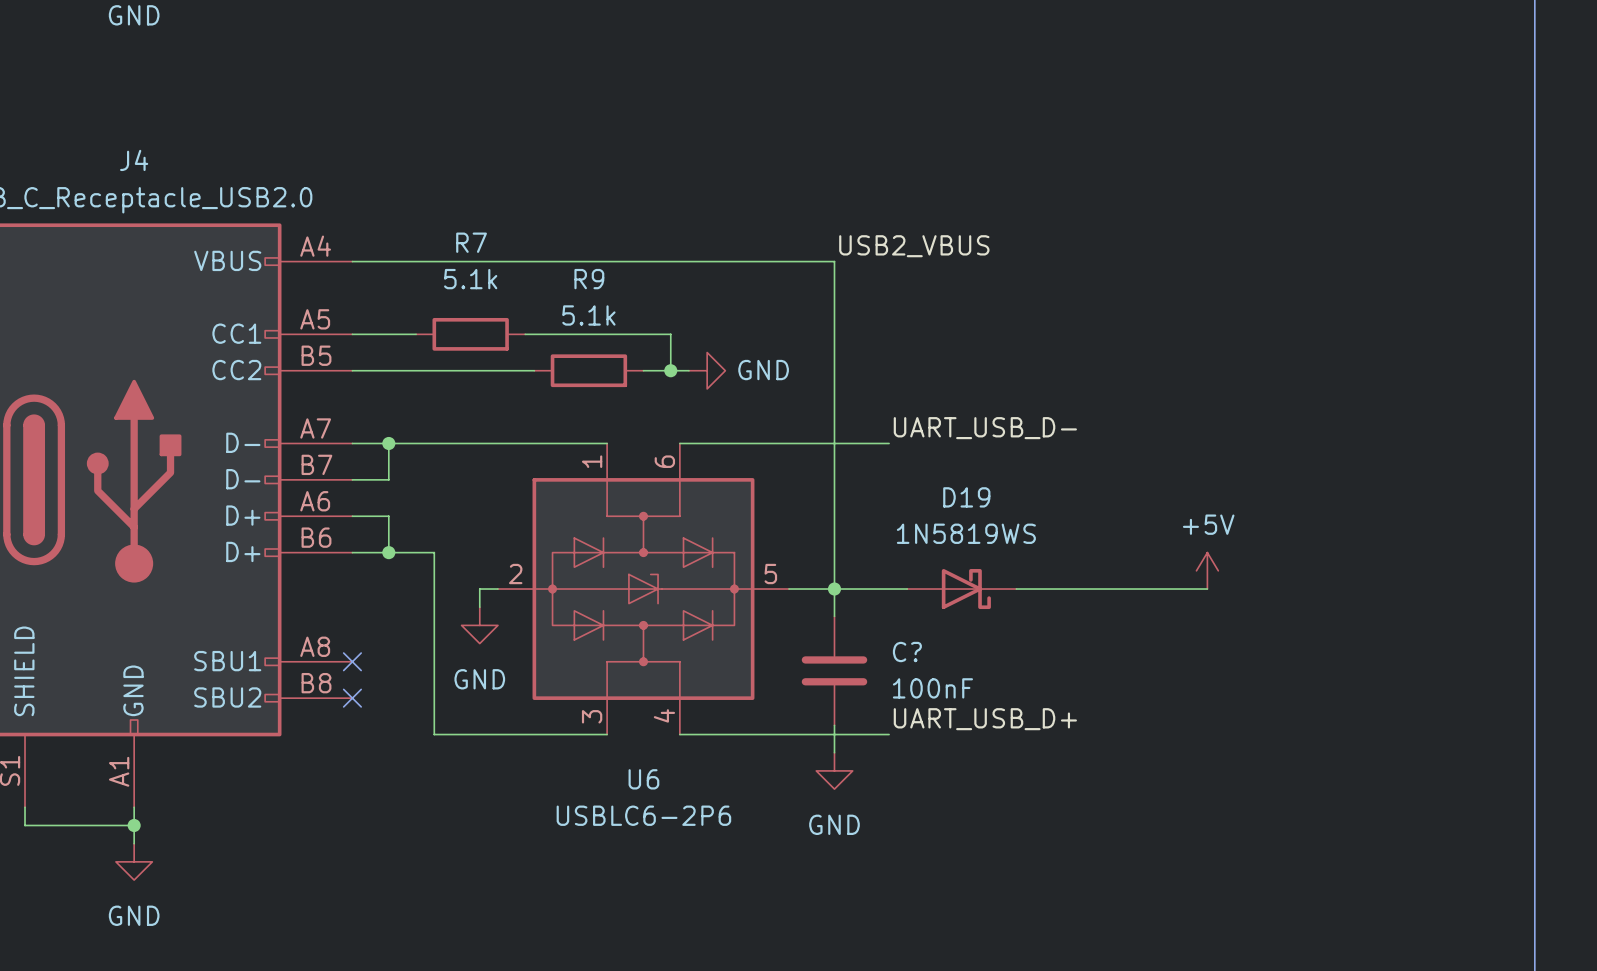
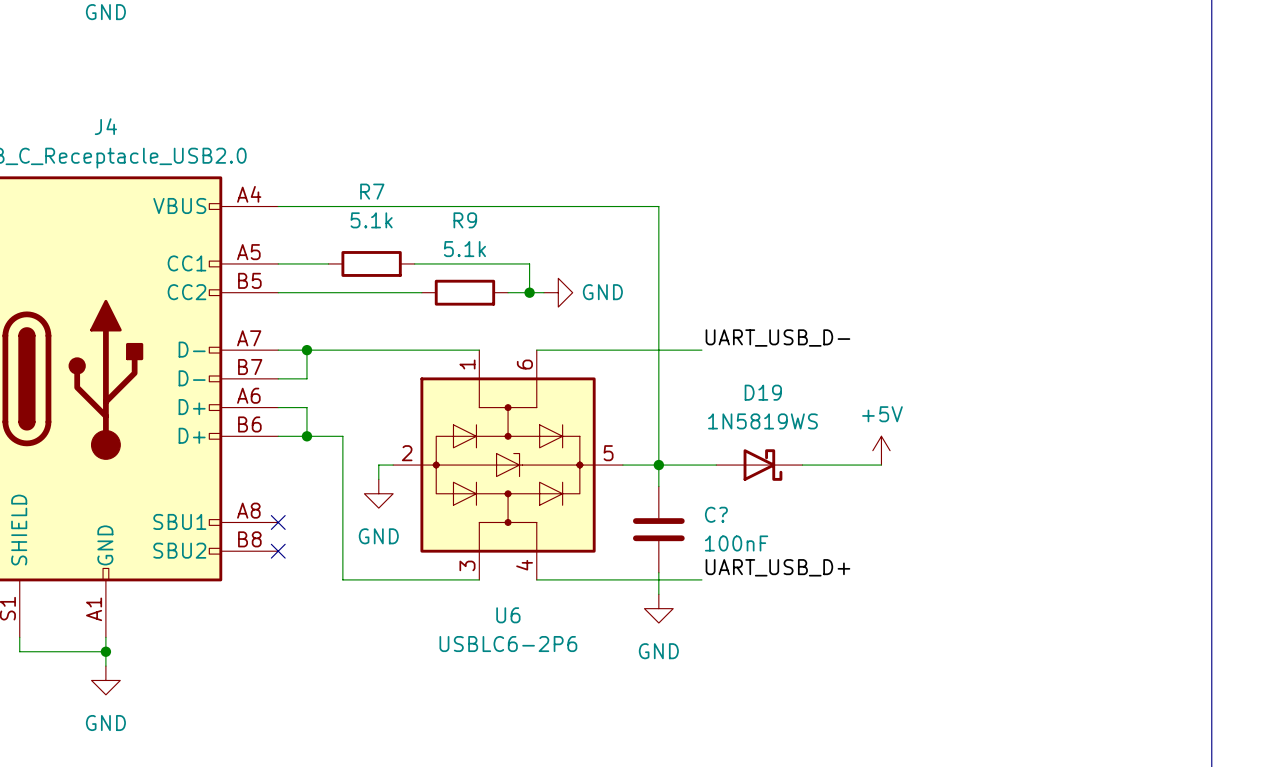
label: USB2_VBUS (914, 246) -> none
power symbol position: +5V (1207, 570) -> +5V (881, 450)
wire: (1116, 589) (1207, 589) -> none

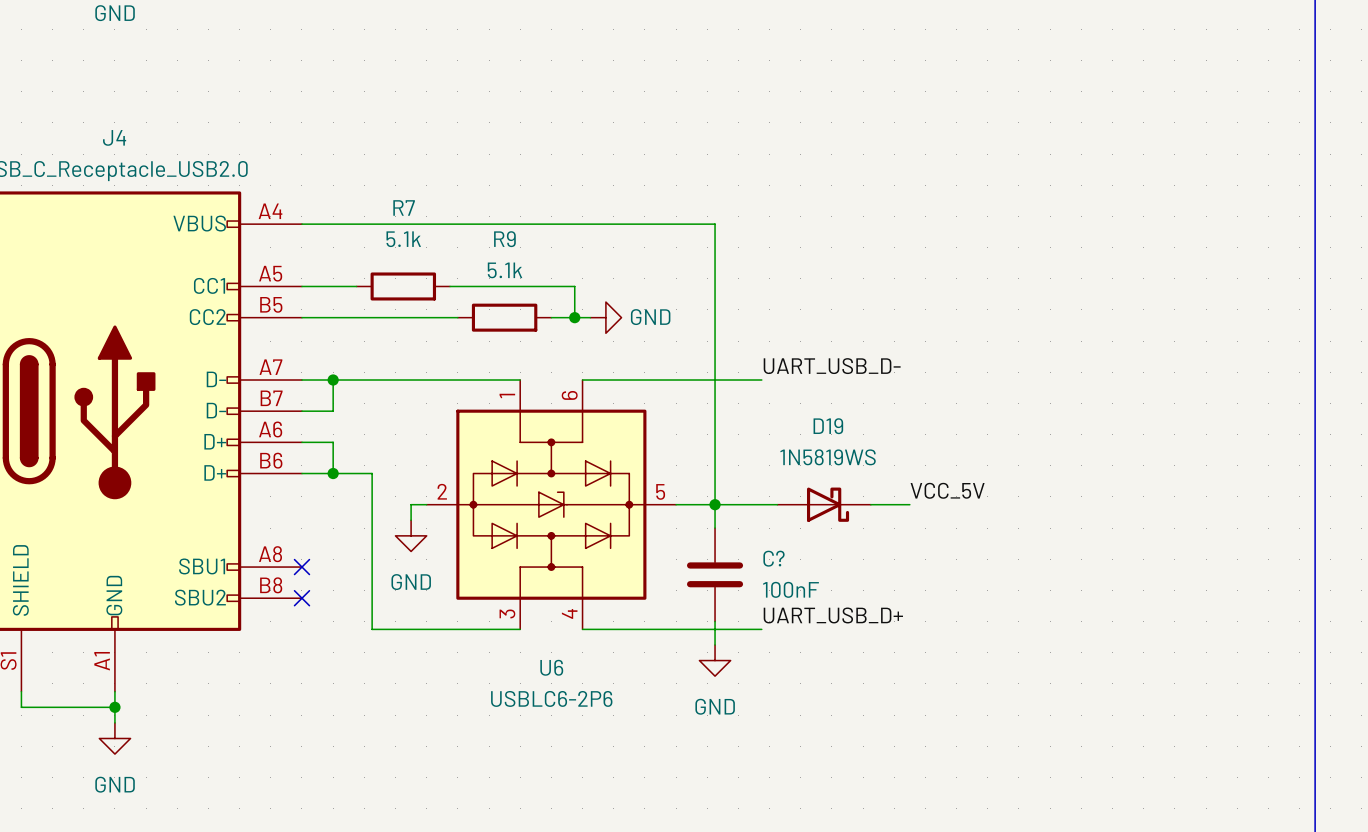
power symbol: +5V (881, 450) -> none
label: none -> VCC_5V (947, 490)
wire: (838, 465) (881, 465) -> none

